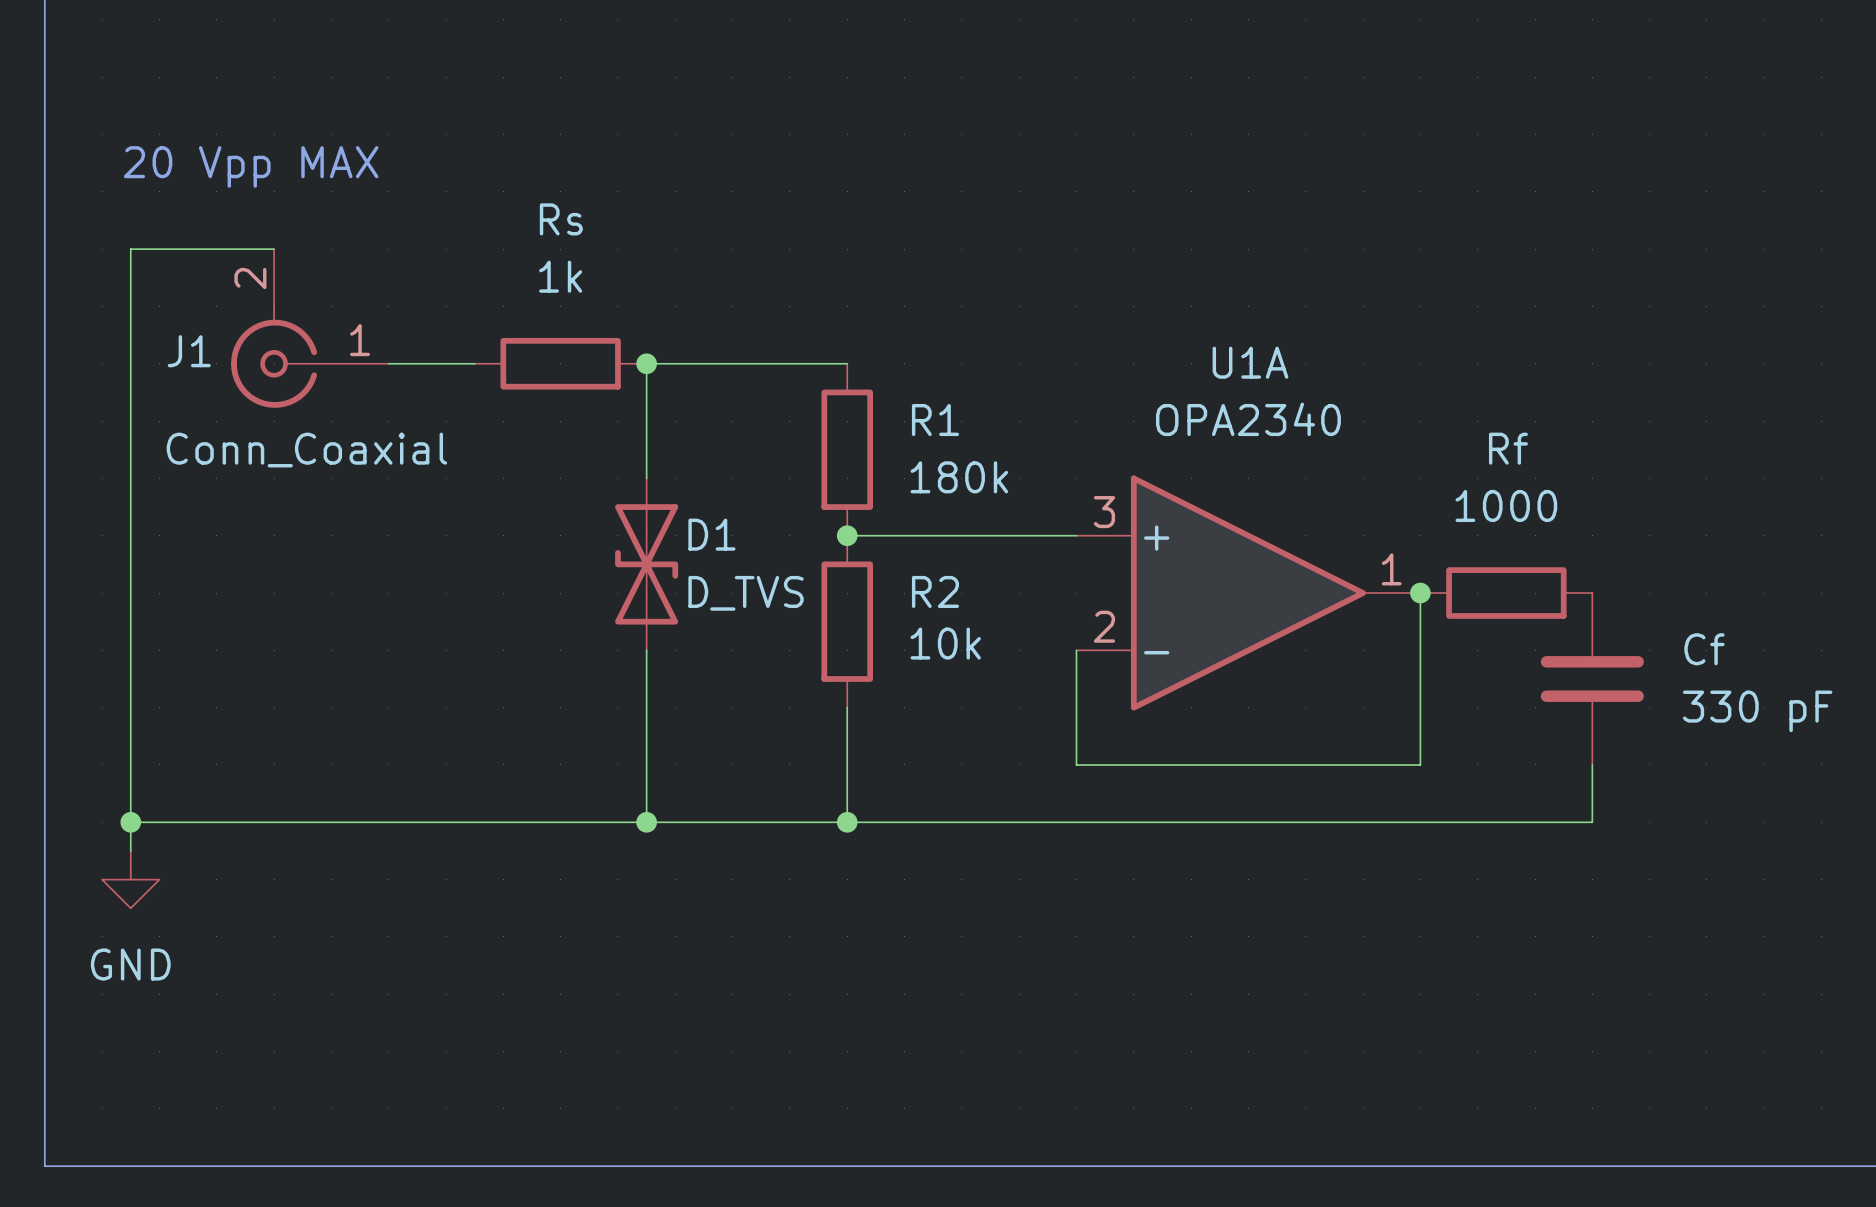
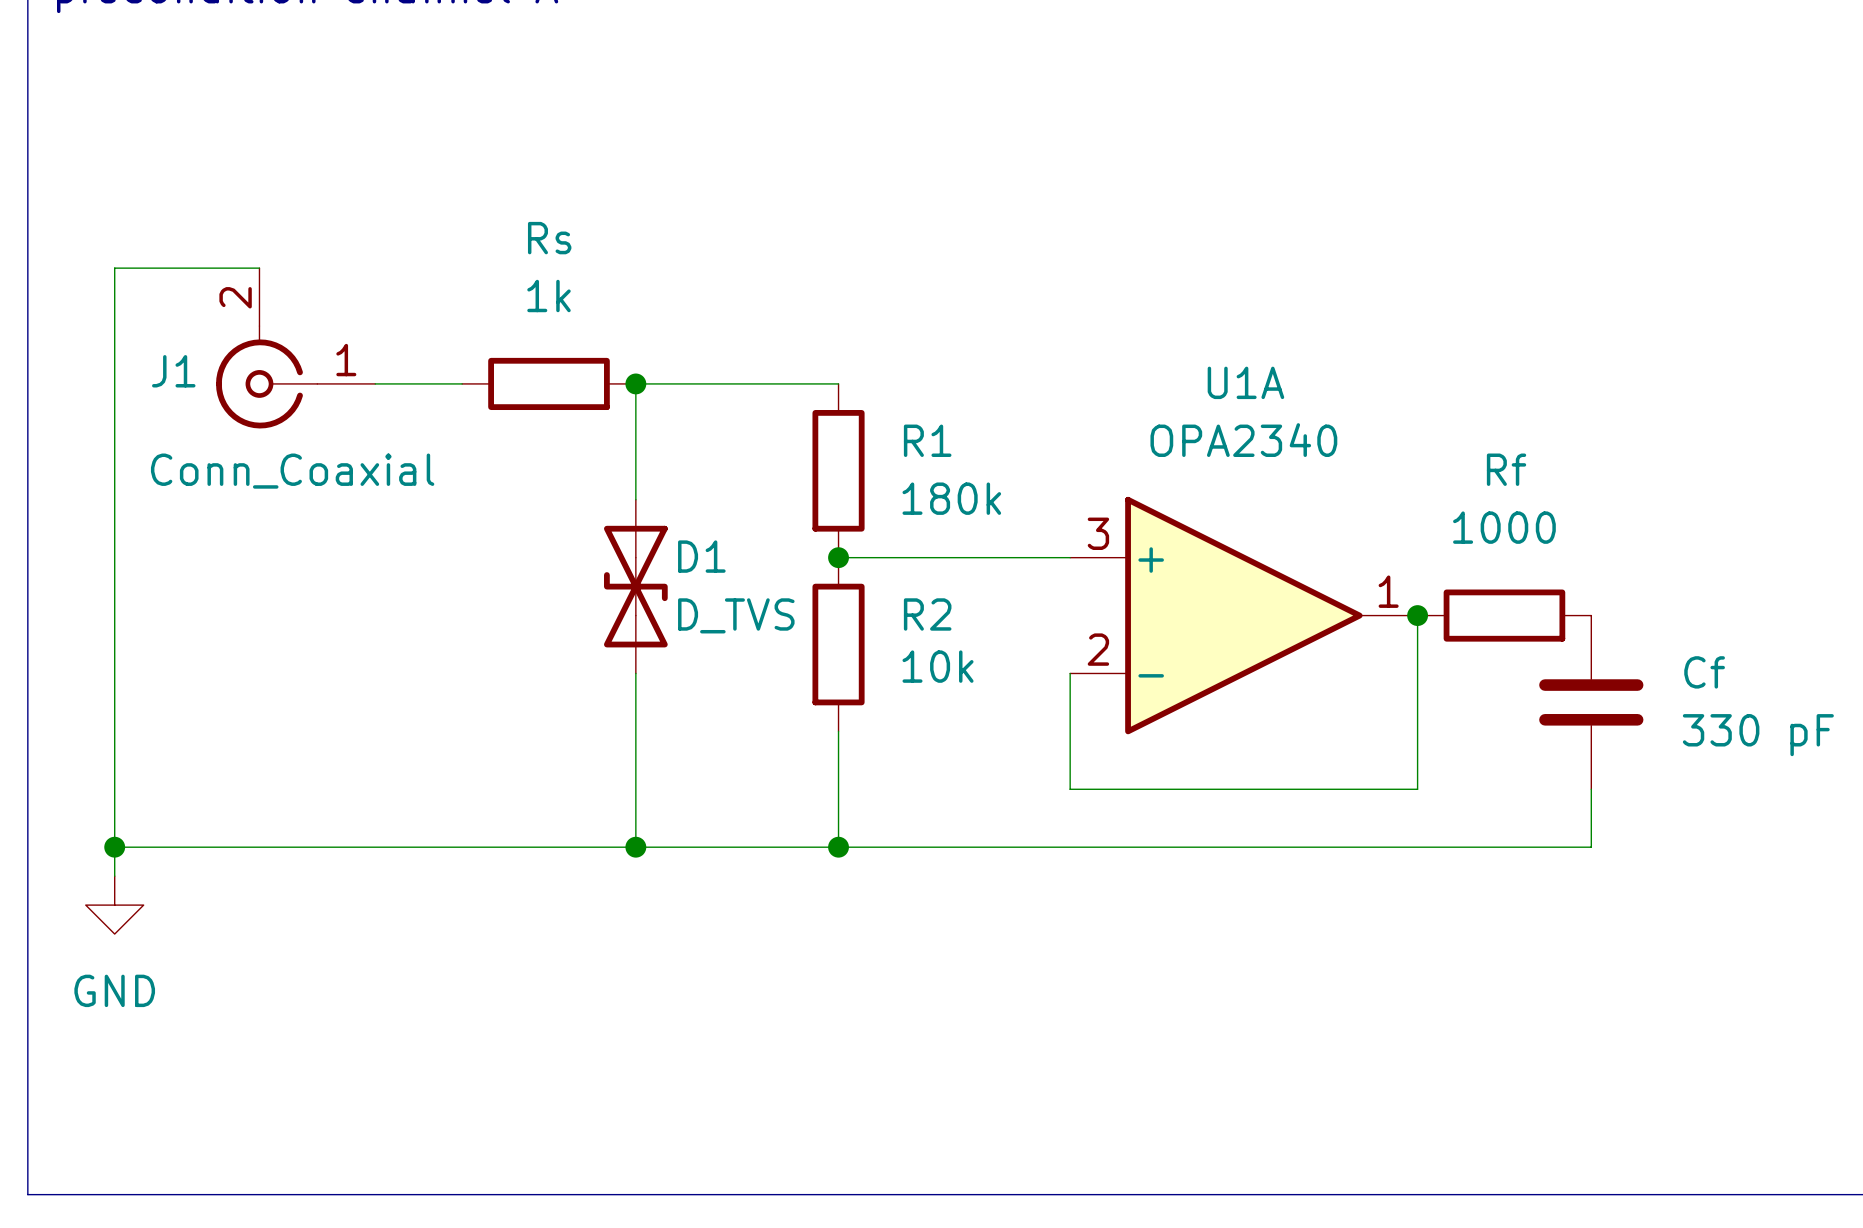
text: 20 Vpp MAX (251, 166) -> none

